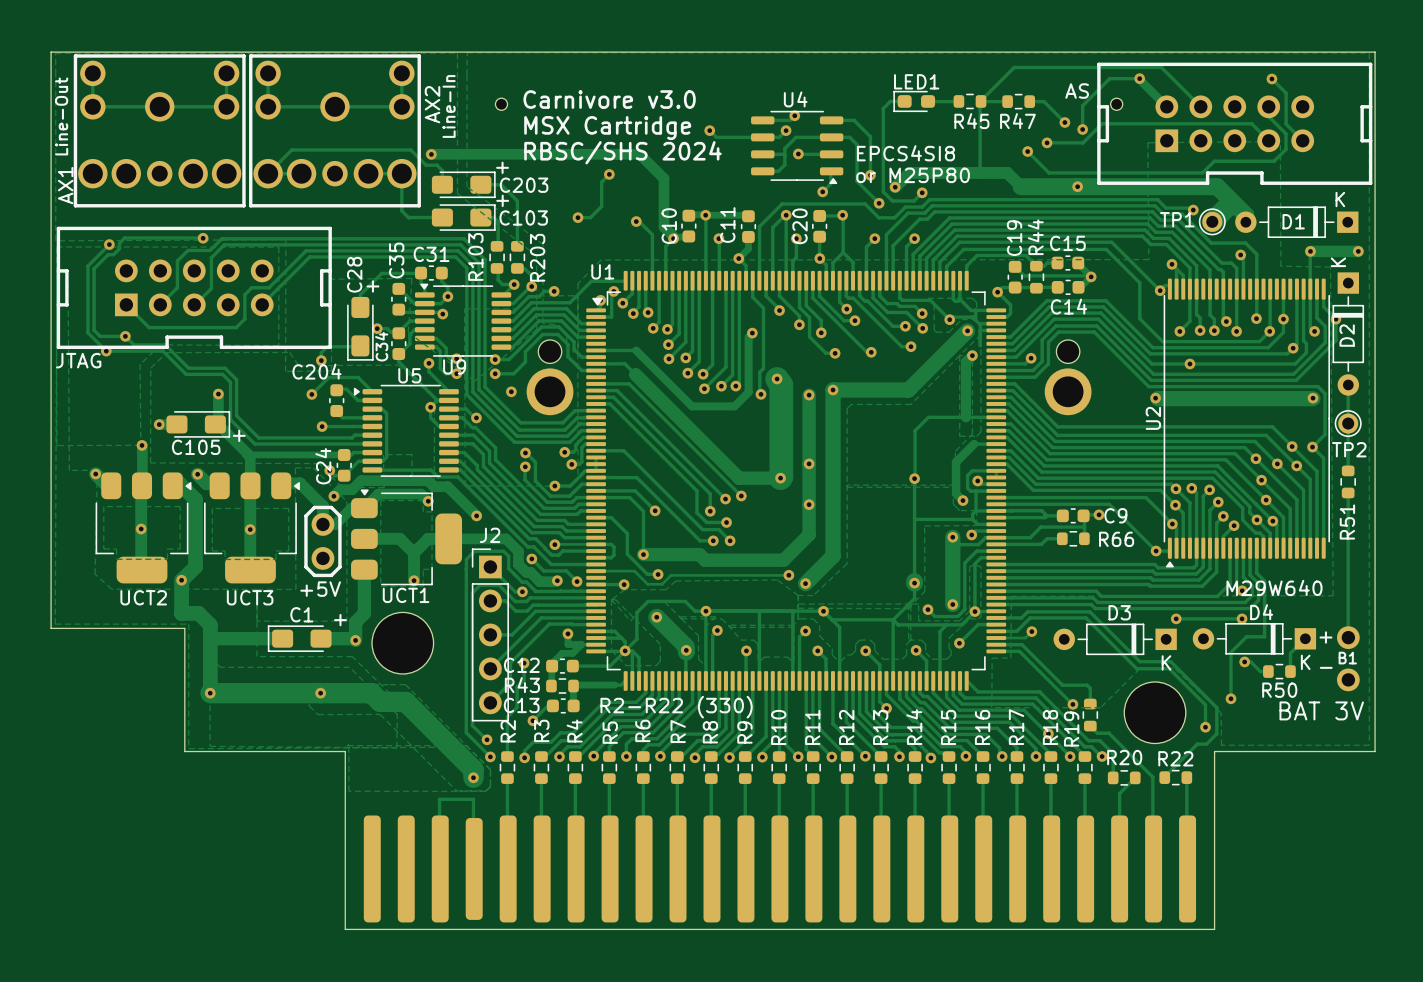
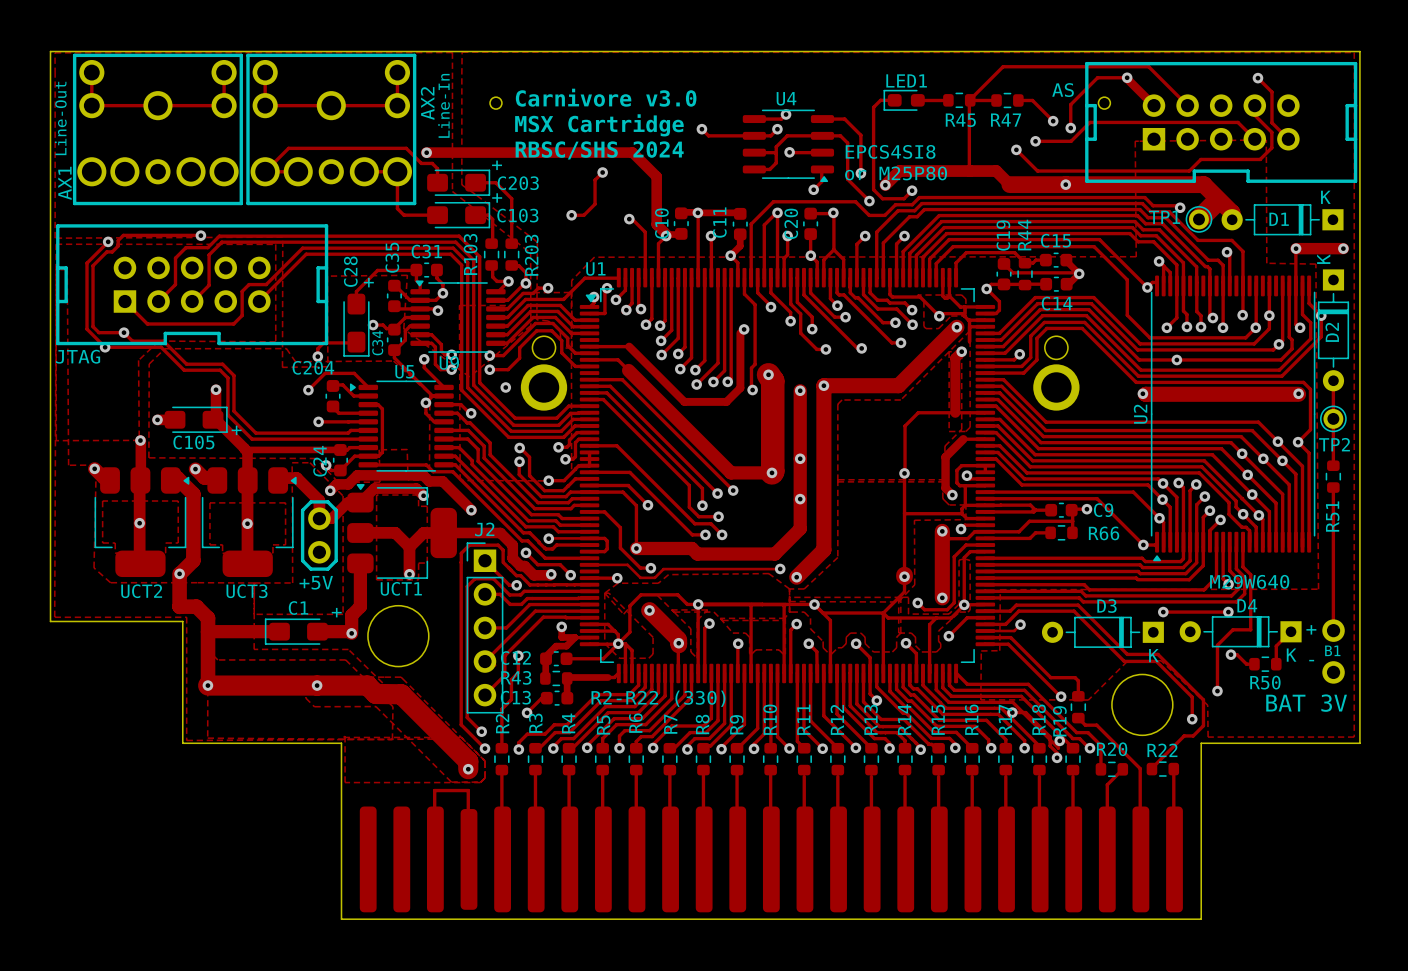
track: none -> (1012, 712) (1025, 712) (1050, 736) (1050, 745) (1057, 752) (1057, 757)
via: none -> (1012, 712)
via: (1048, 733) -> none
via: none -> (1059, 740)
via: (1070, 756) -> none
via: none -> (1057, 757)

